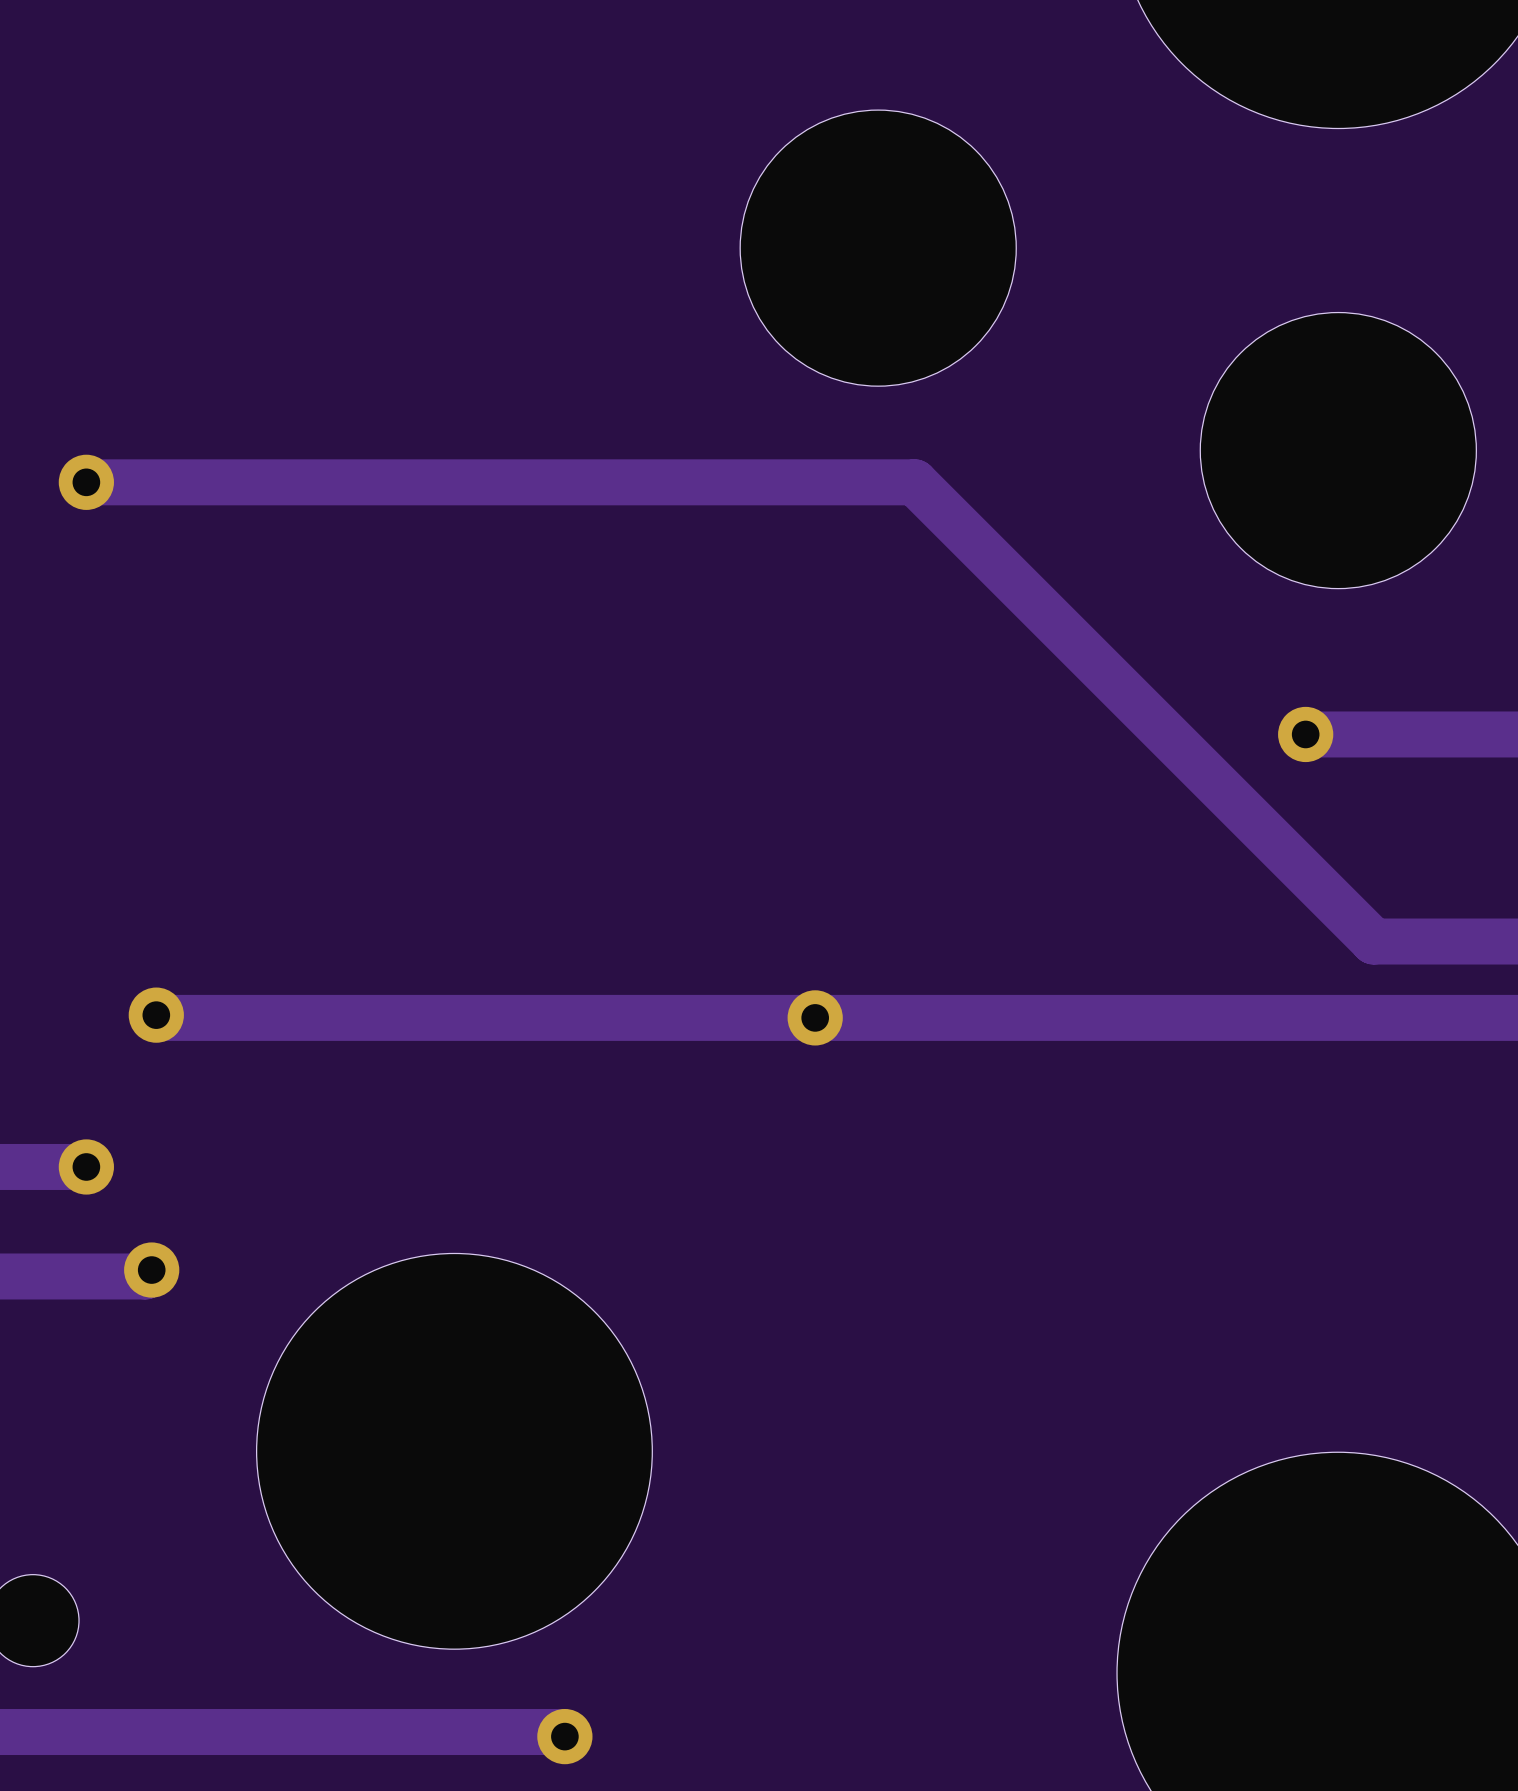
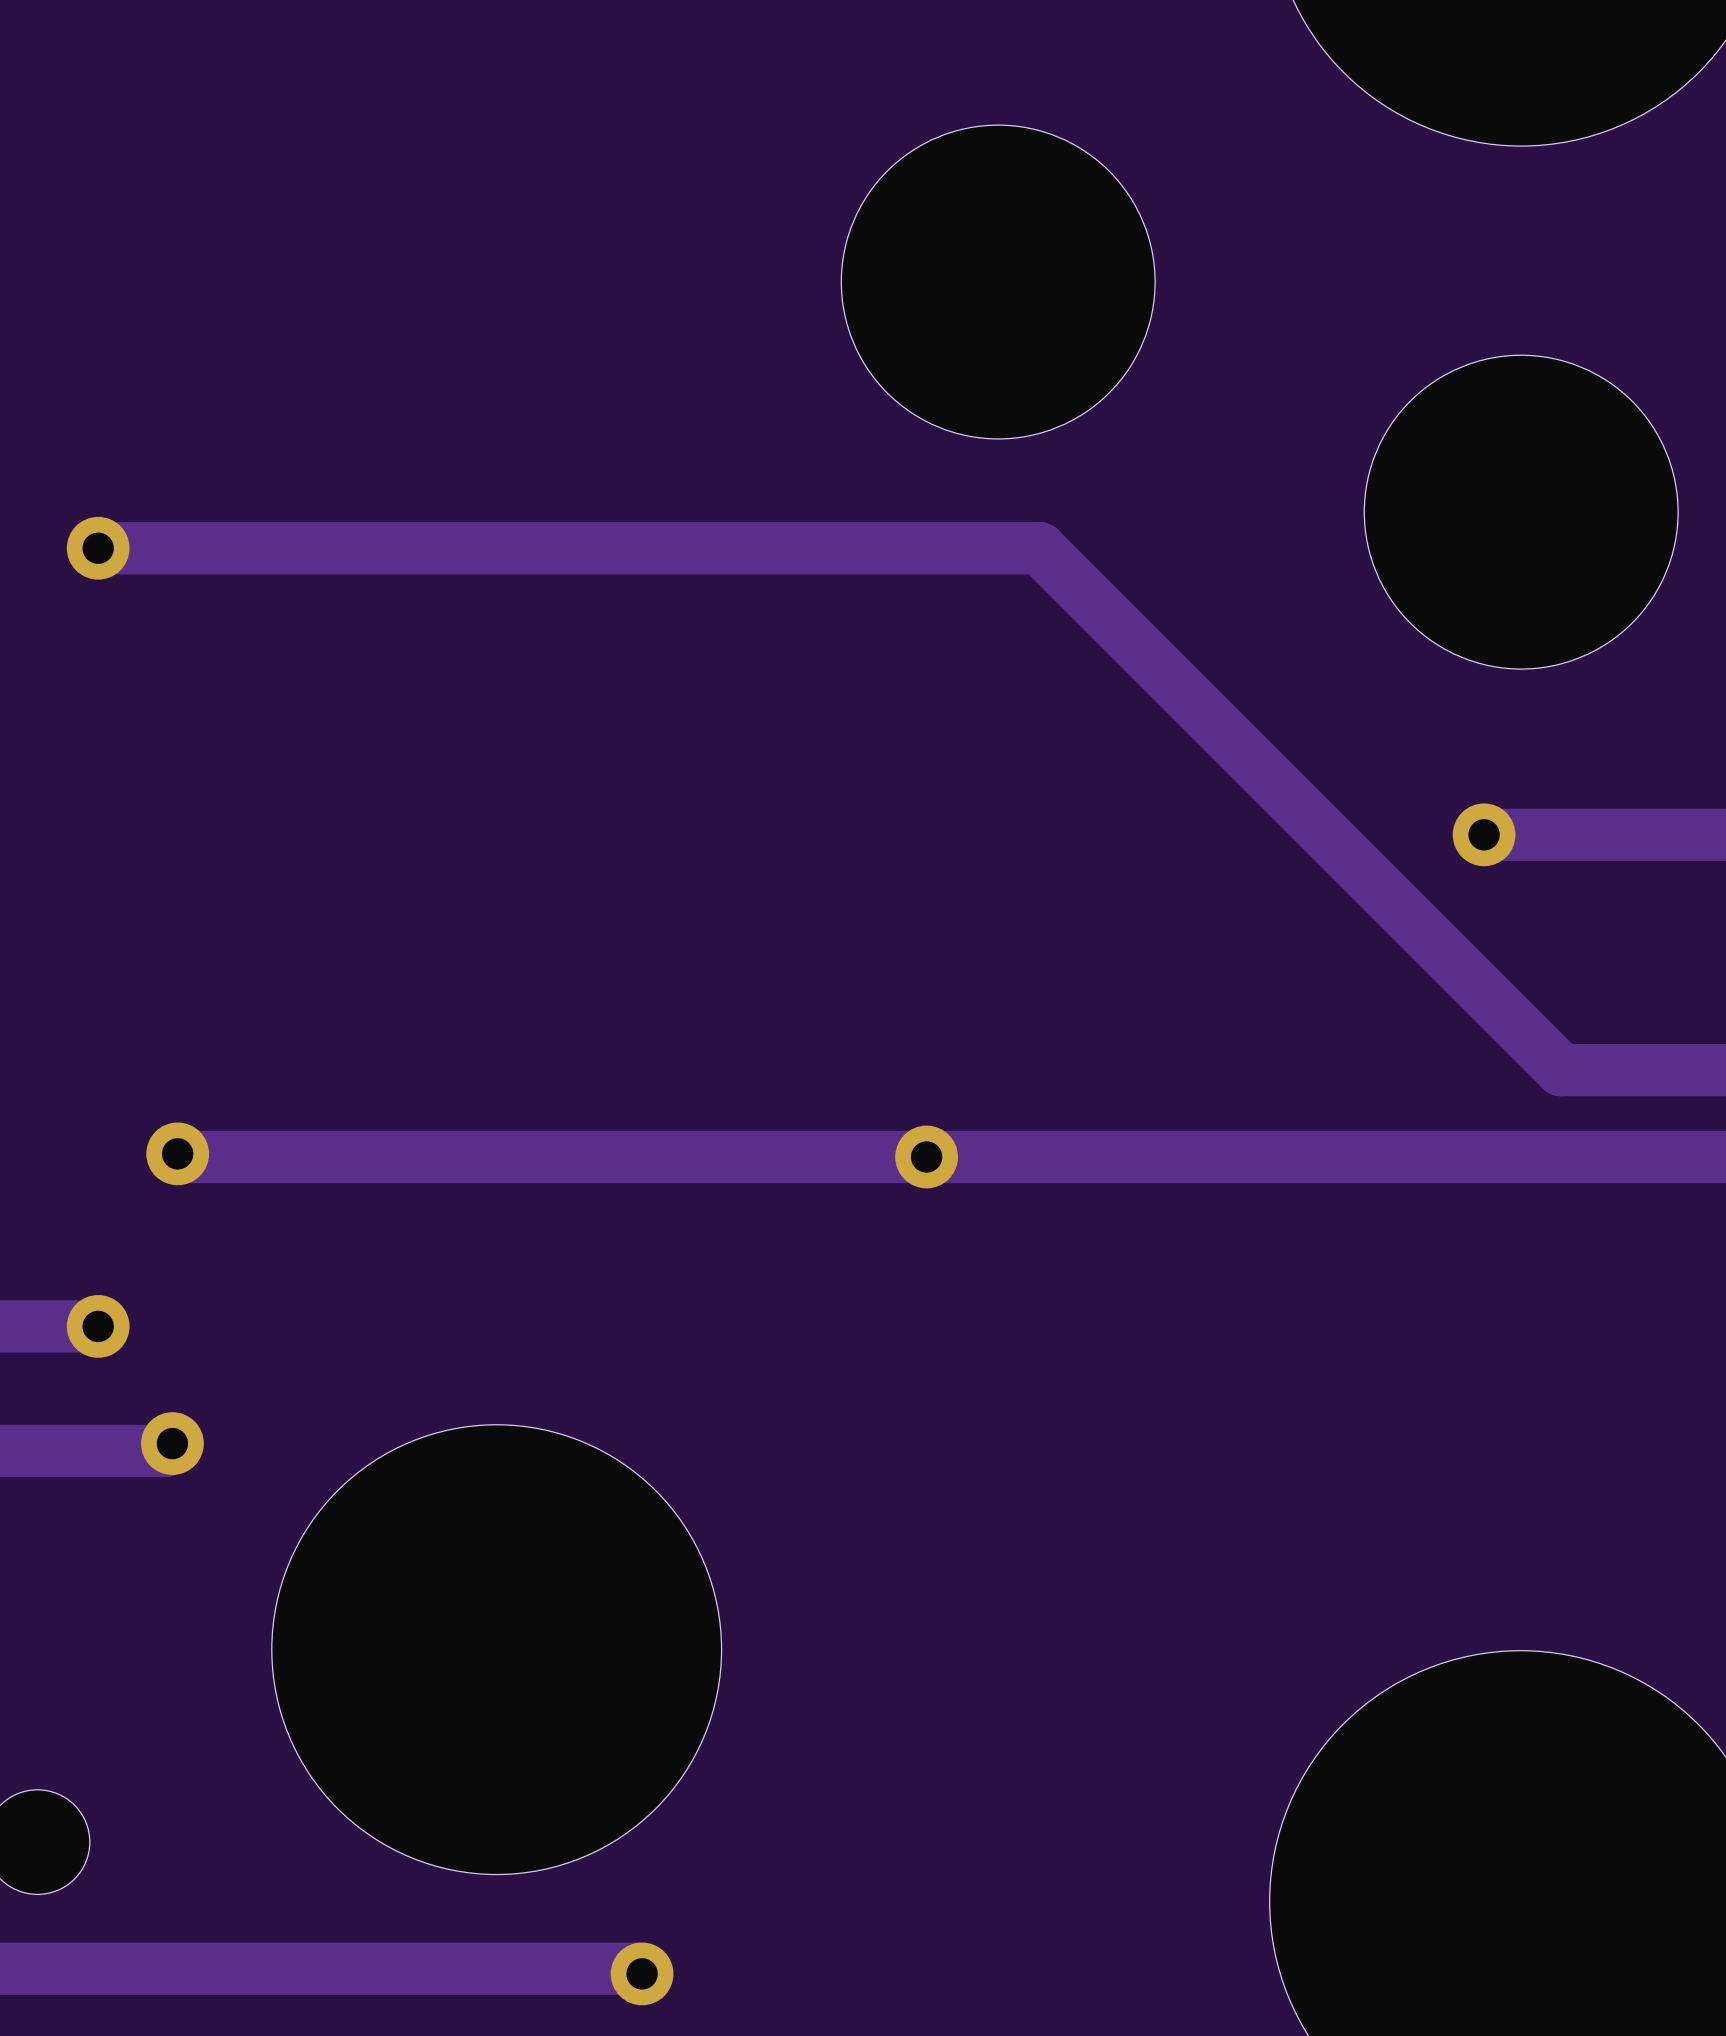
part position: (454, 1451) -> (496, 1649)

